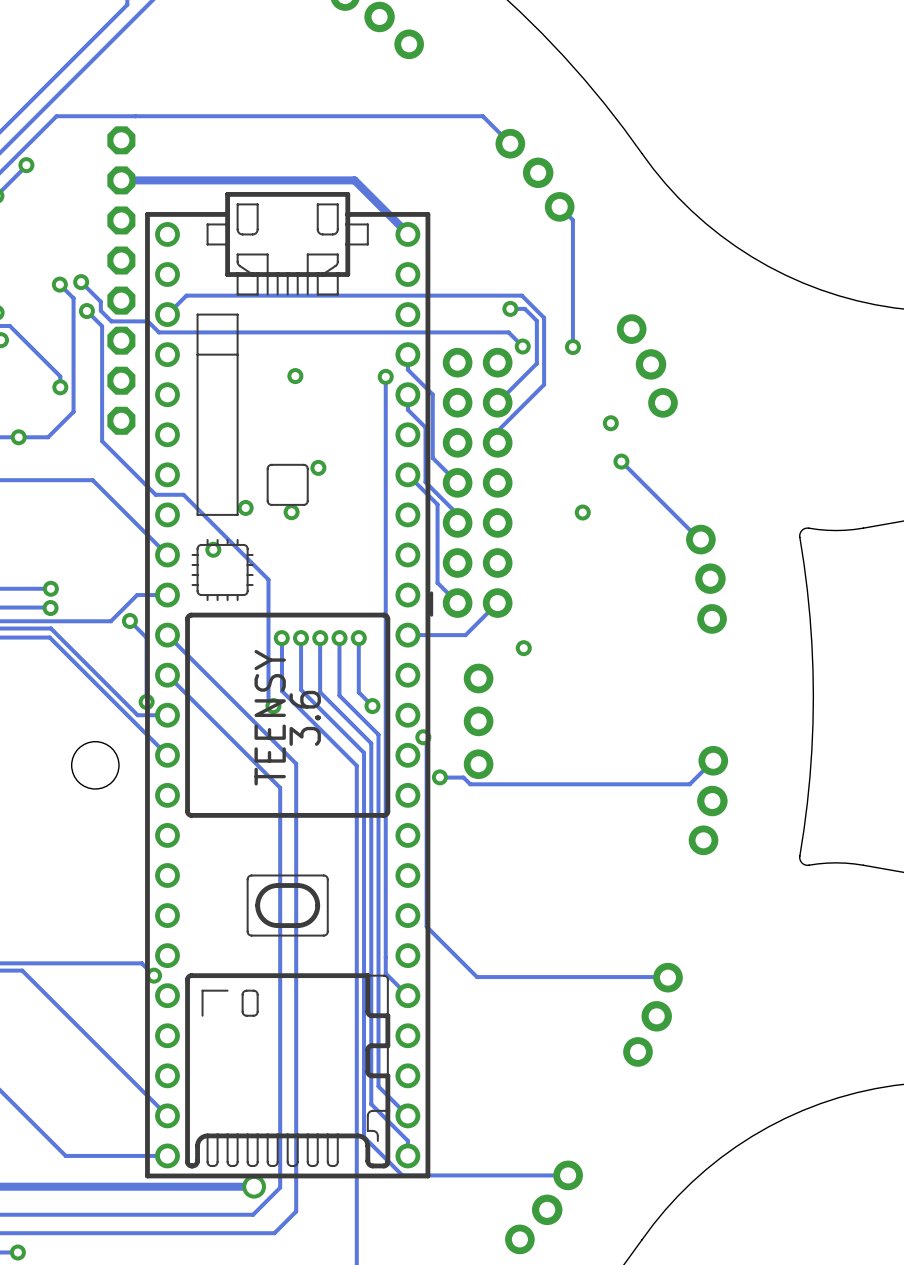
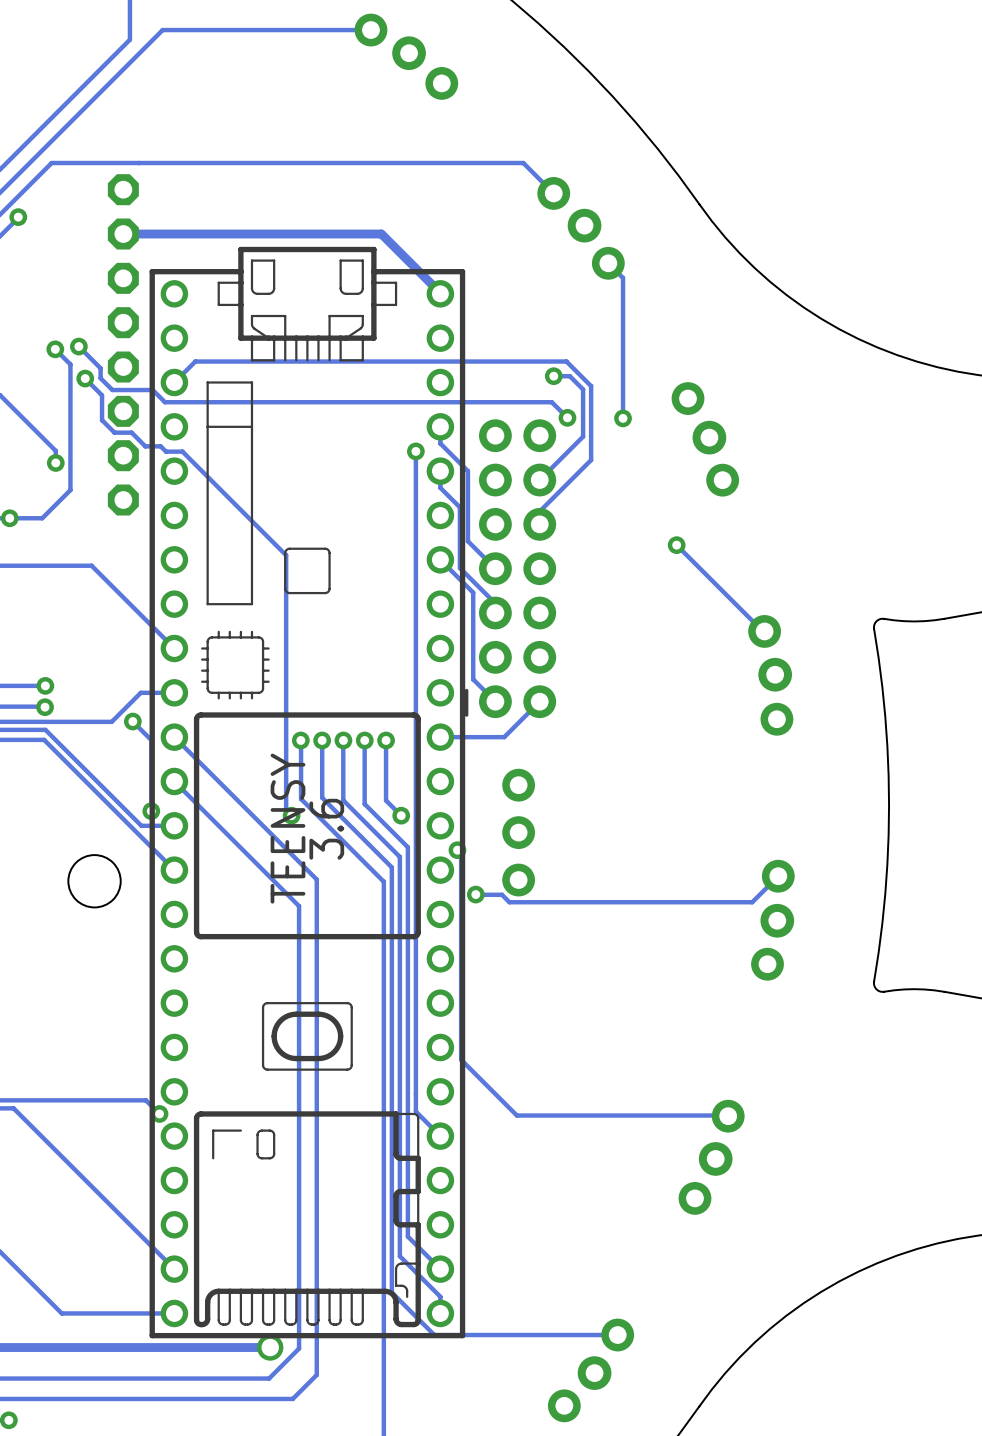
track: (102, 348) (102, 441) (155, 494) (183, 494) (268, 579) -> (102, 420) (114, 432) (131, 432) (145, 446) (160, 446) (165, 451) (182, 451) (286, 555) (286, 675)
via: (295, 376) -> none
via: (610, 423) -> none
via: (318, 467) -> none
via: (245, 507) -> none
via: (291, 512) -> none
via: (582, 512) -> none
via: (213, 549) -> none
via: (523, 648) -> none

